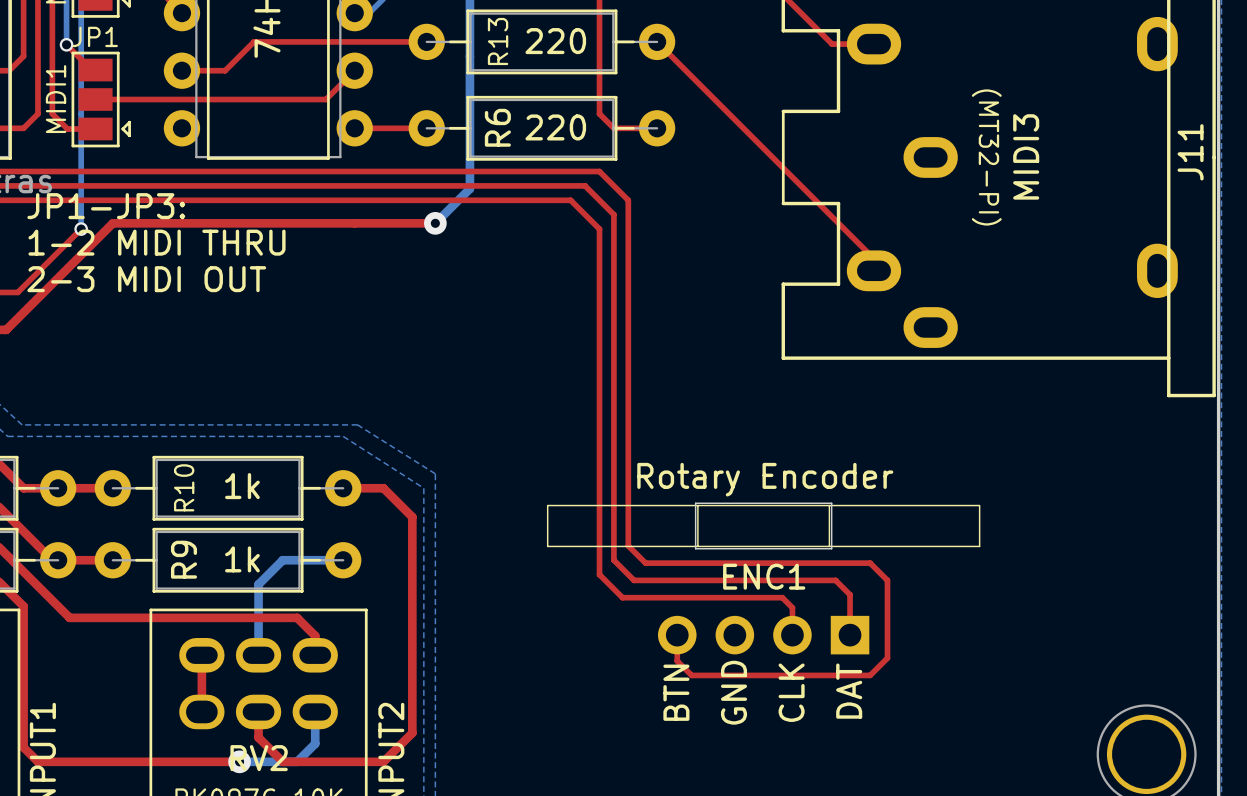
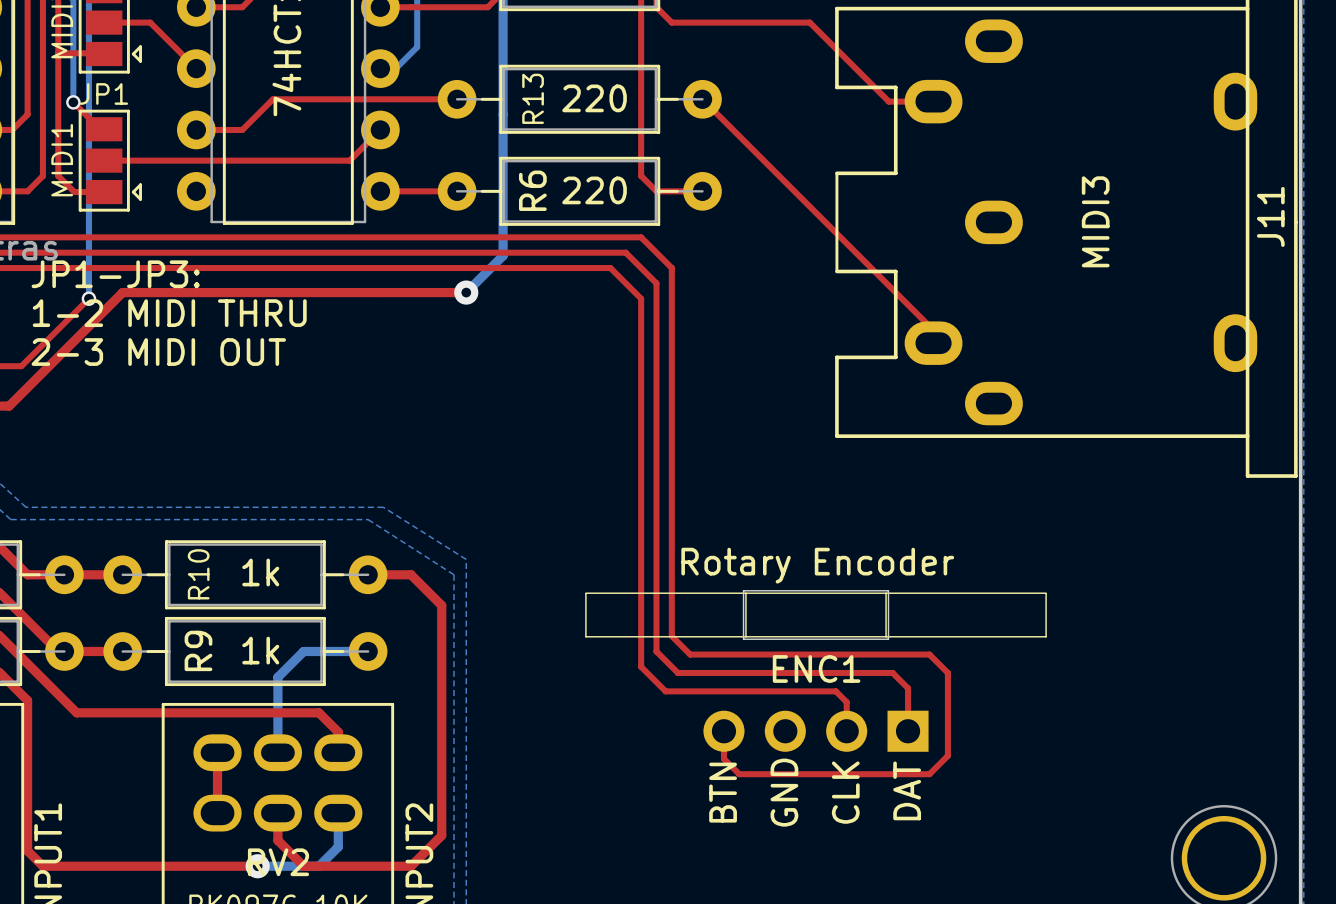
text: (MT32-PI) (986, 157) -> none

